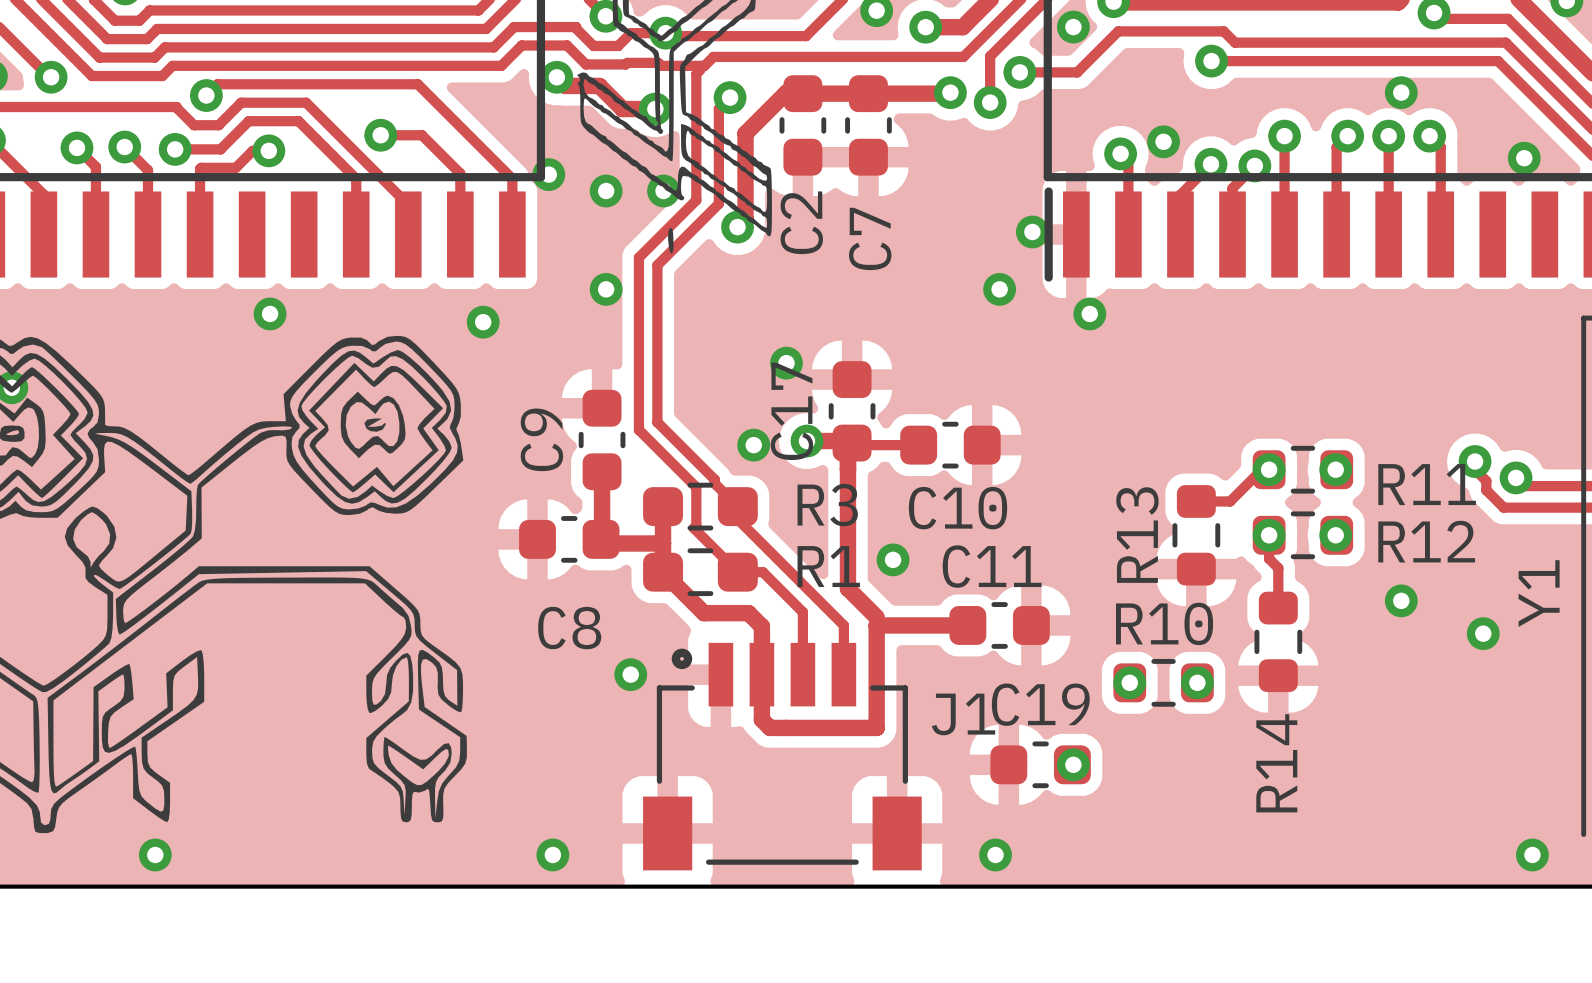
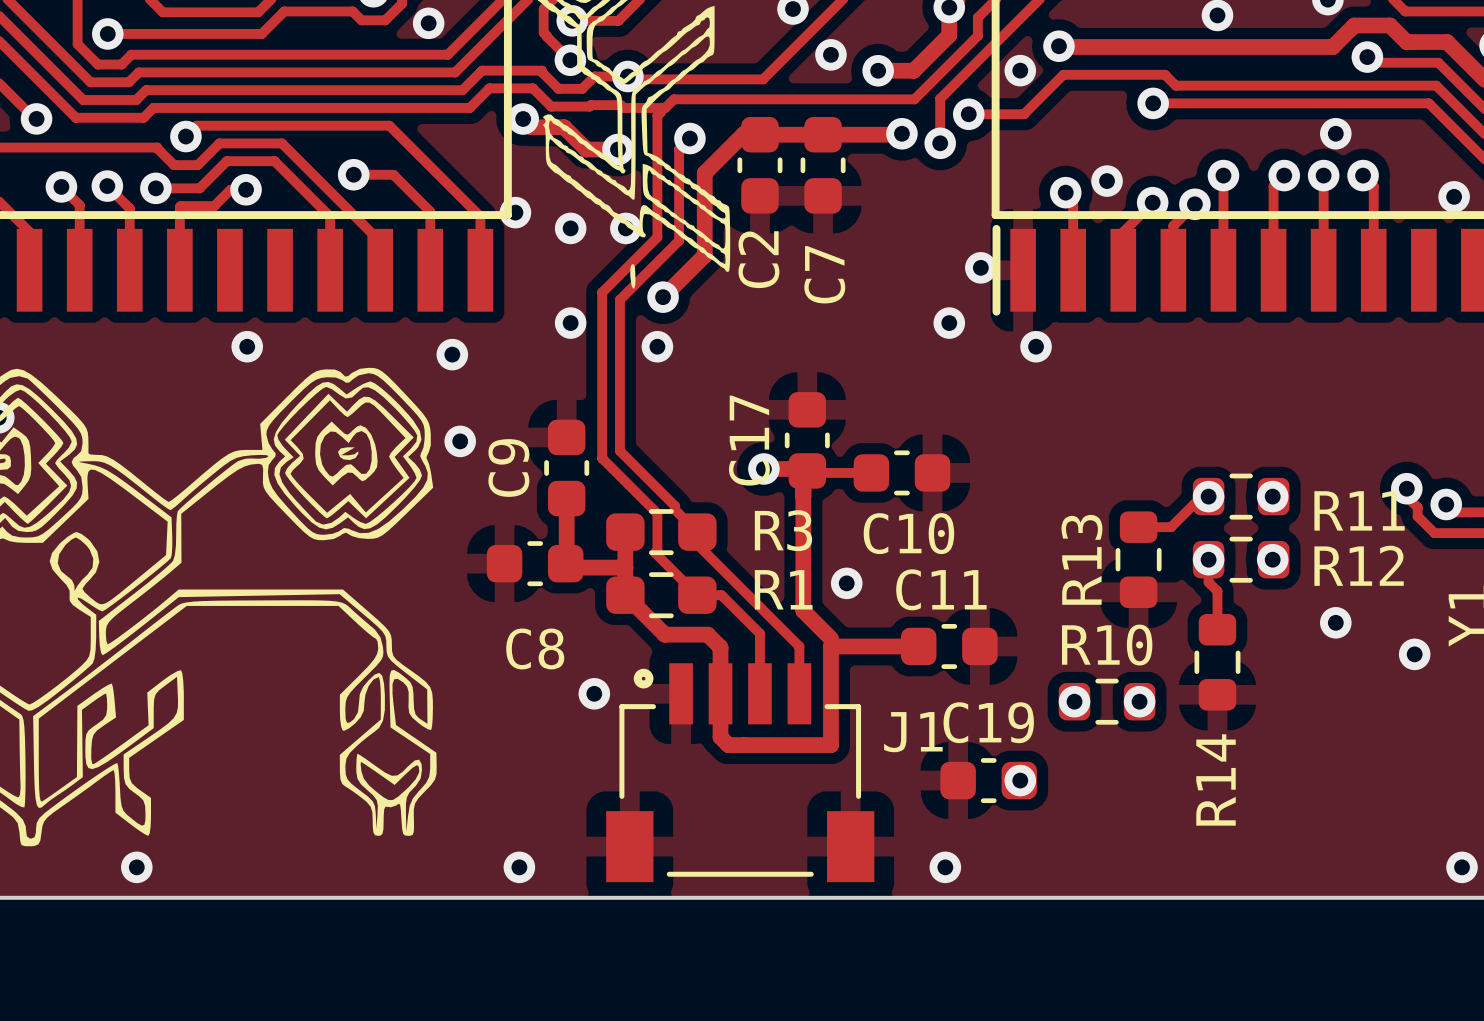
track: none -> (697, 263) (663, 297)
via: (737, 227) -> none
via: none -> (663, 297)
via: none -> (657, 346)
via: (786, 363) -> none
via: none -> (460, 441)
via: (753, 445) -> none

